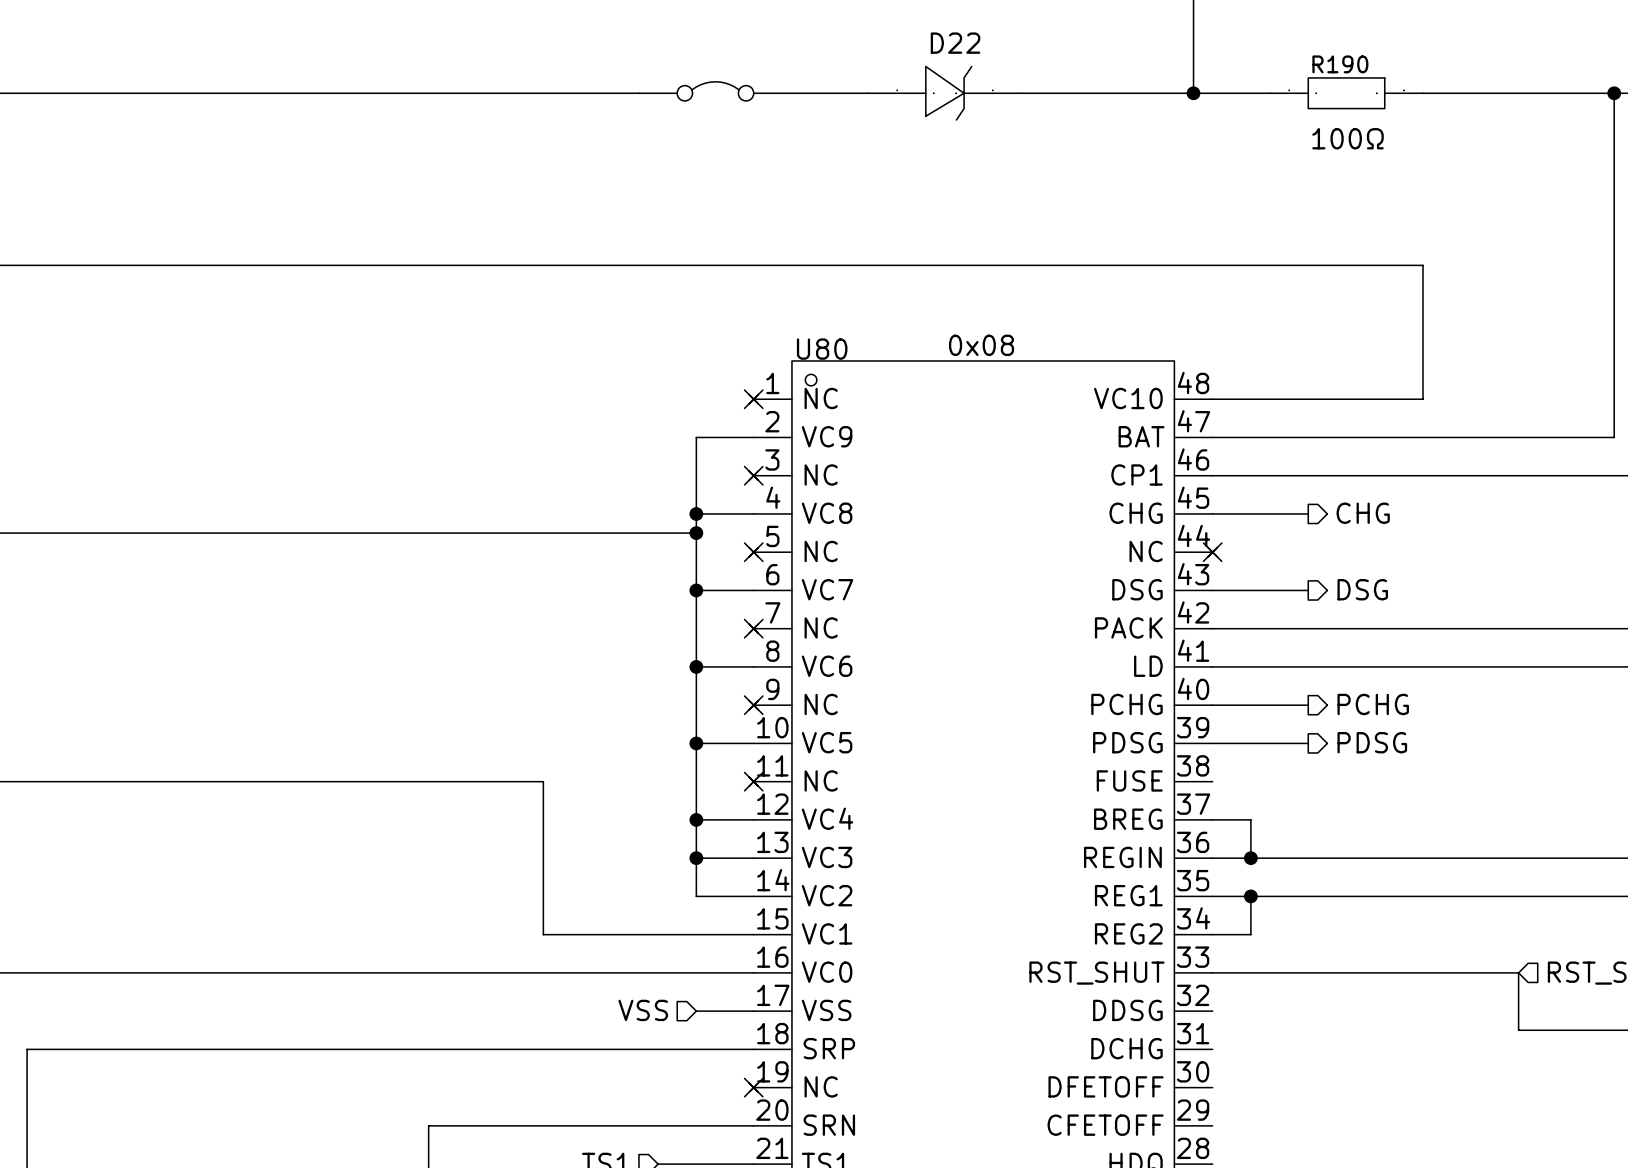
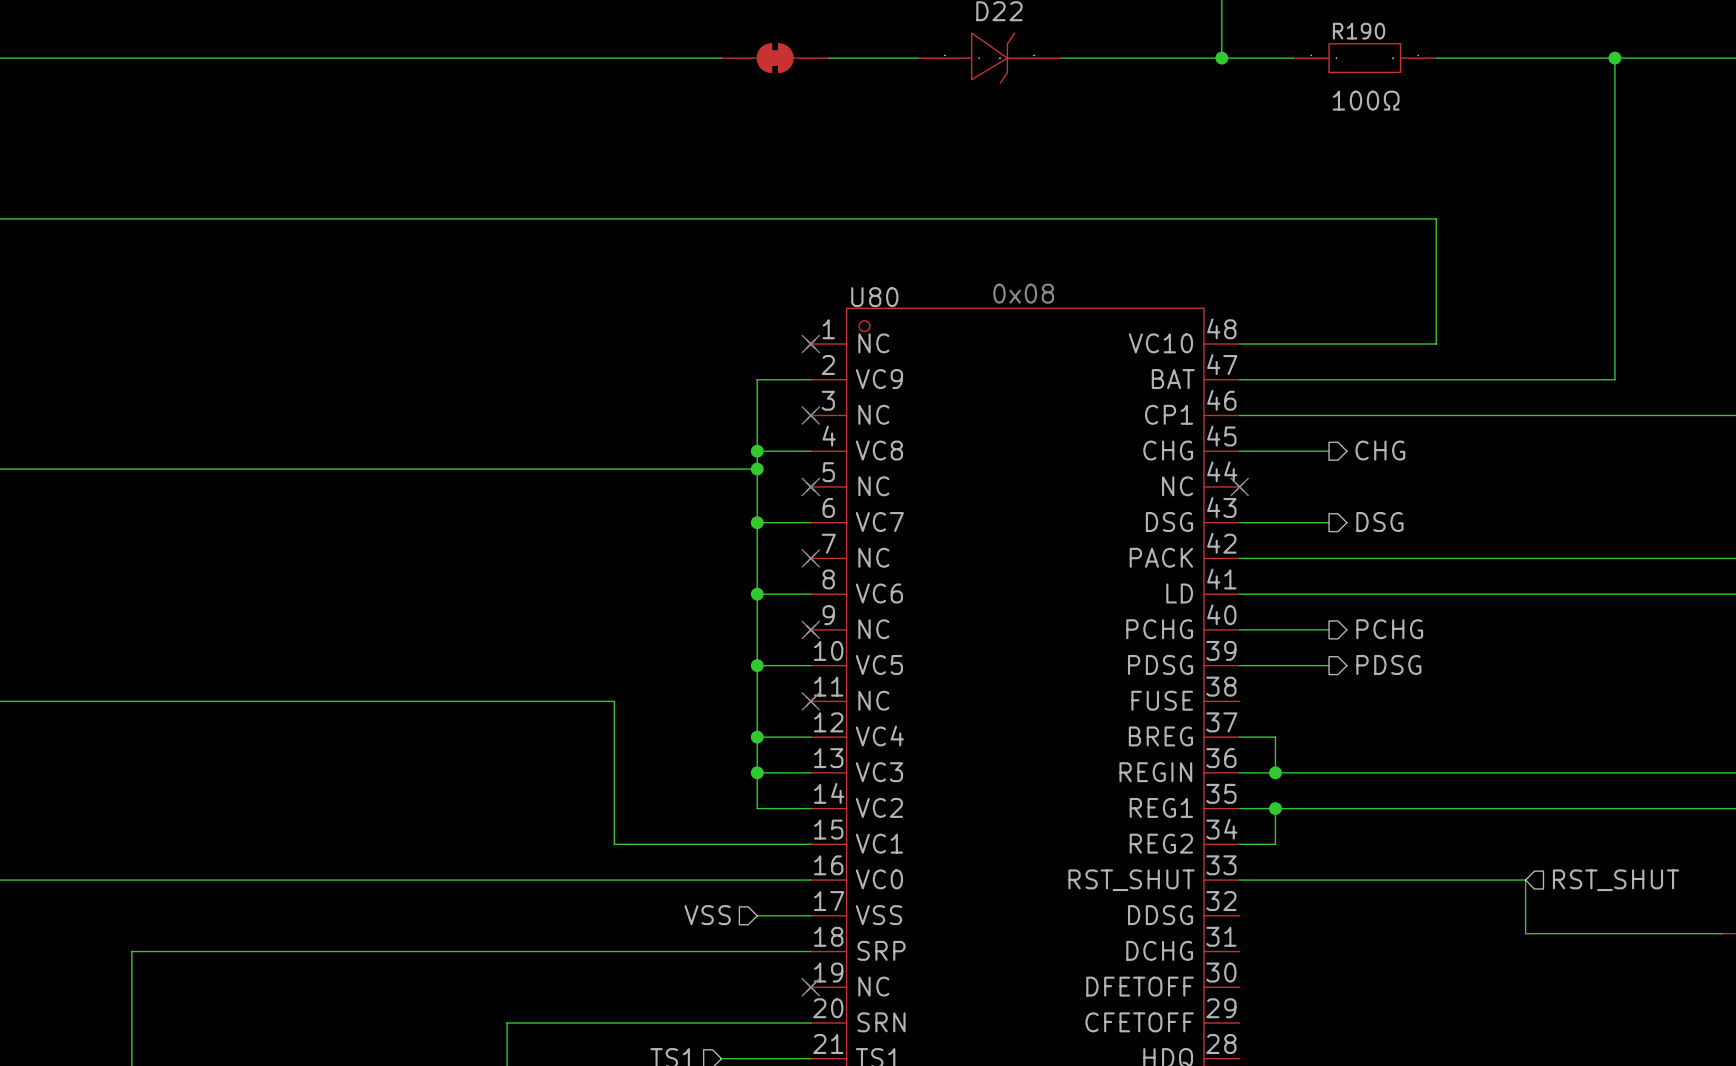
part symbol: [638, 81, 792, 101] -> [721, 43, 829, 73]

